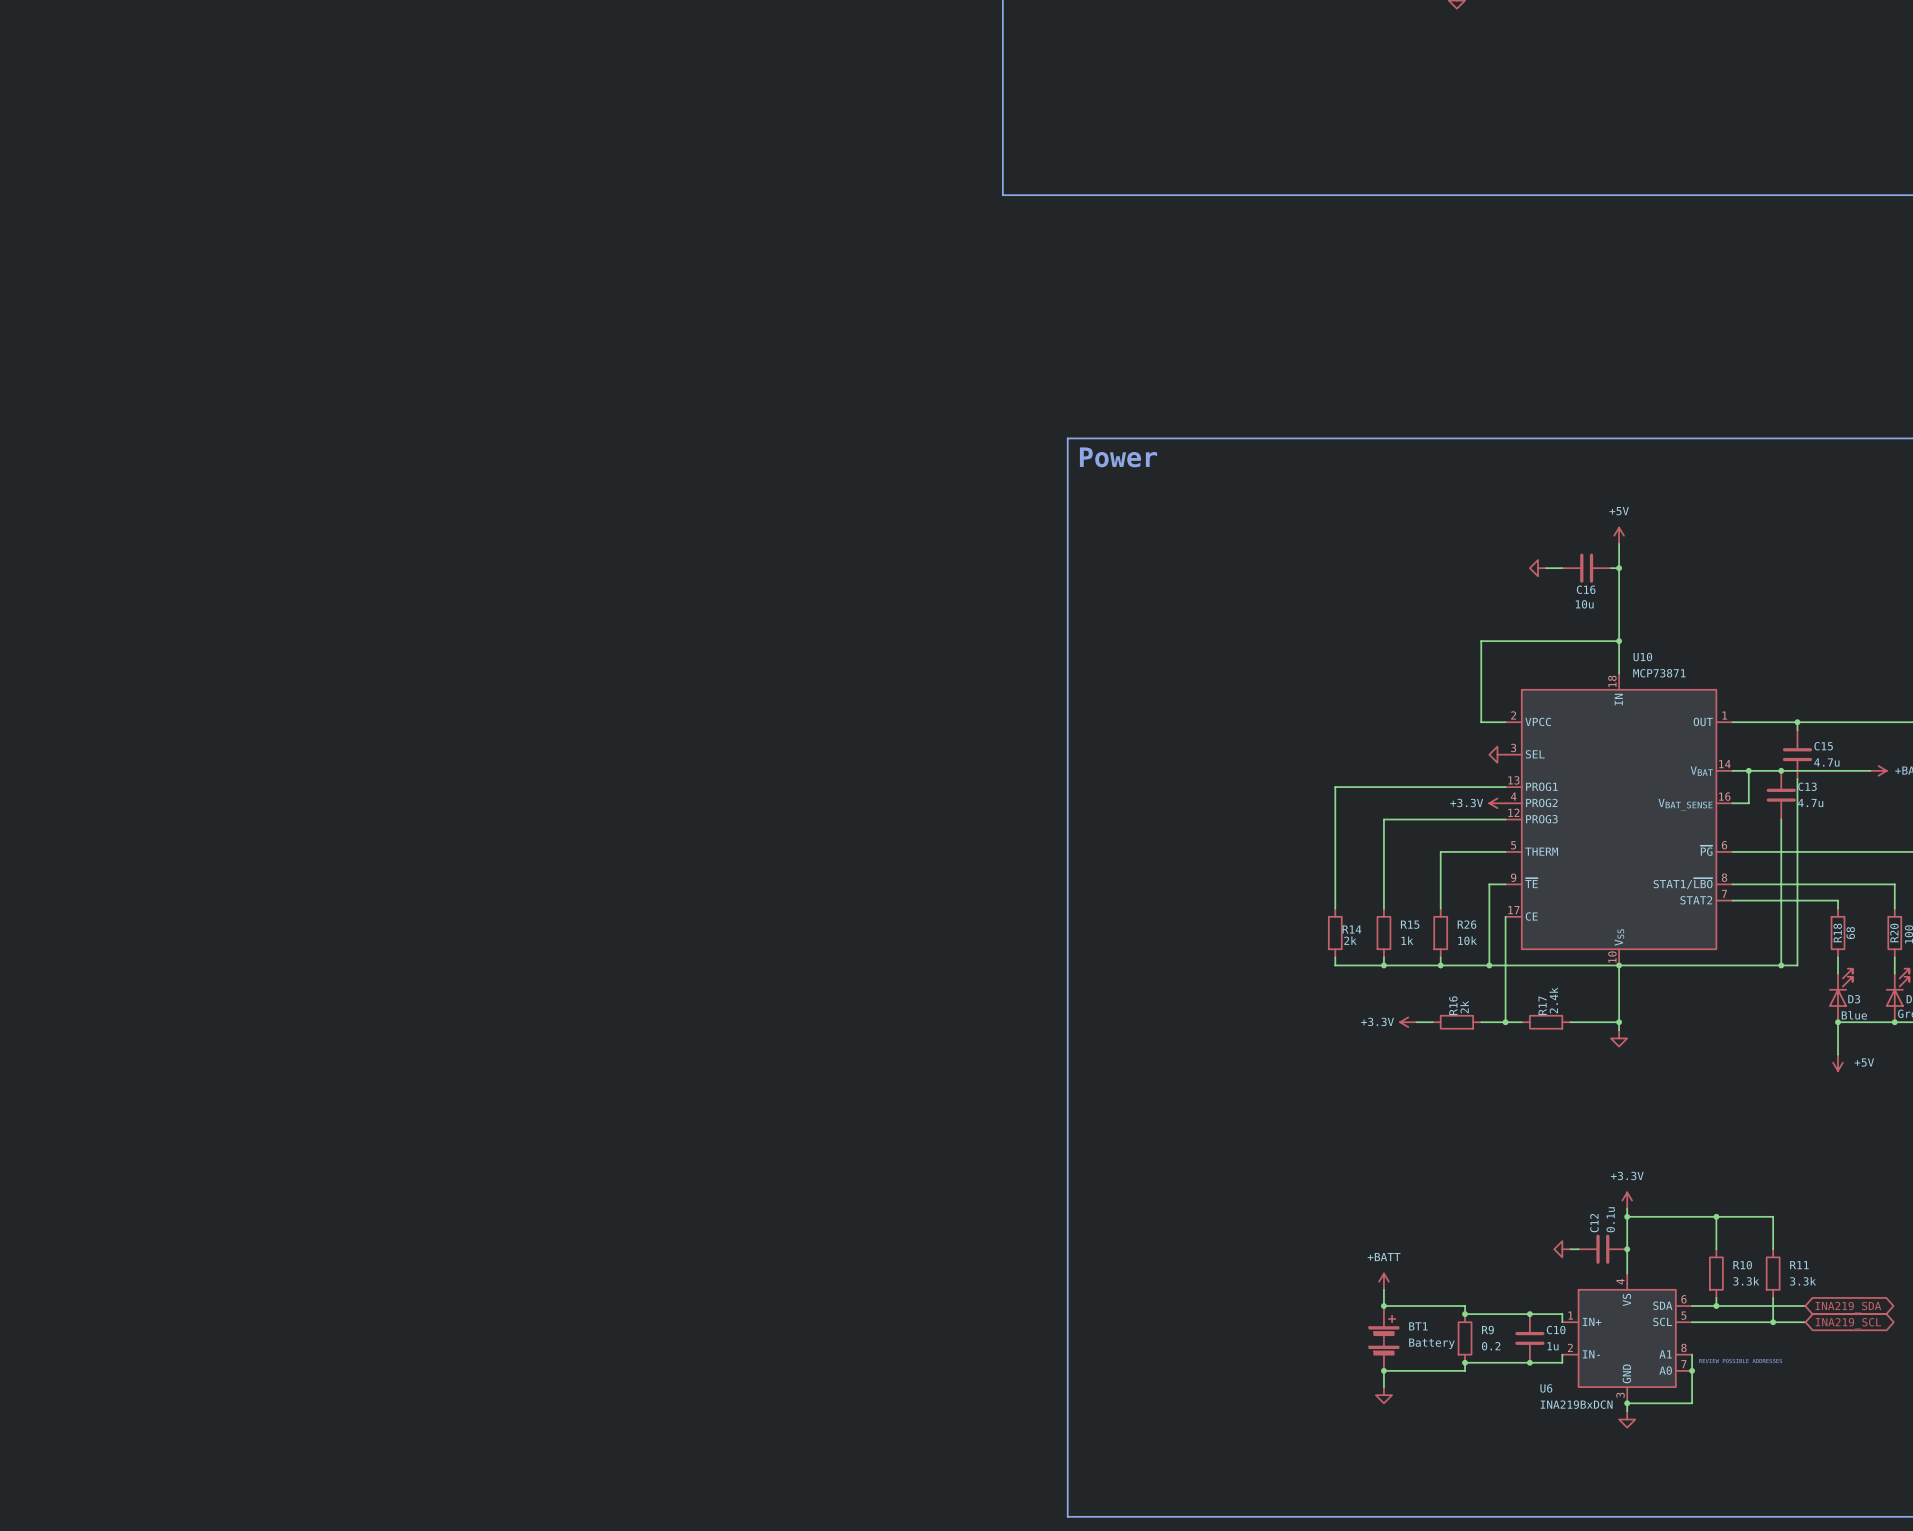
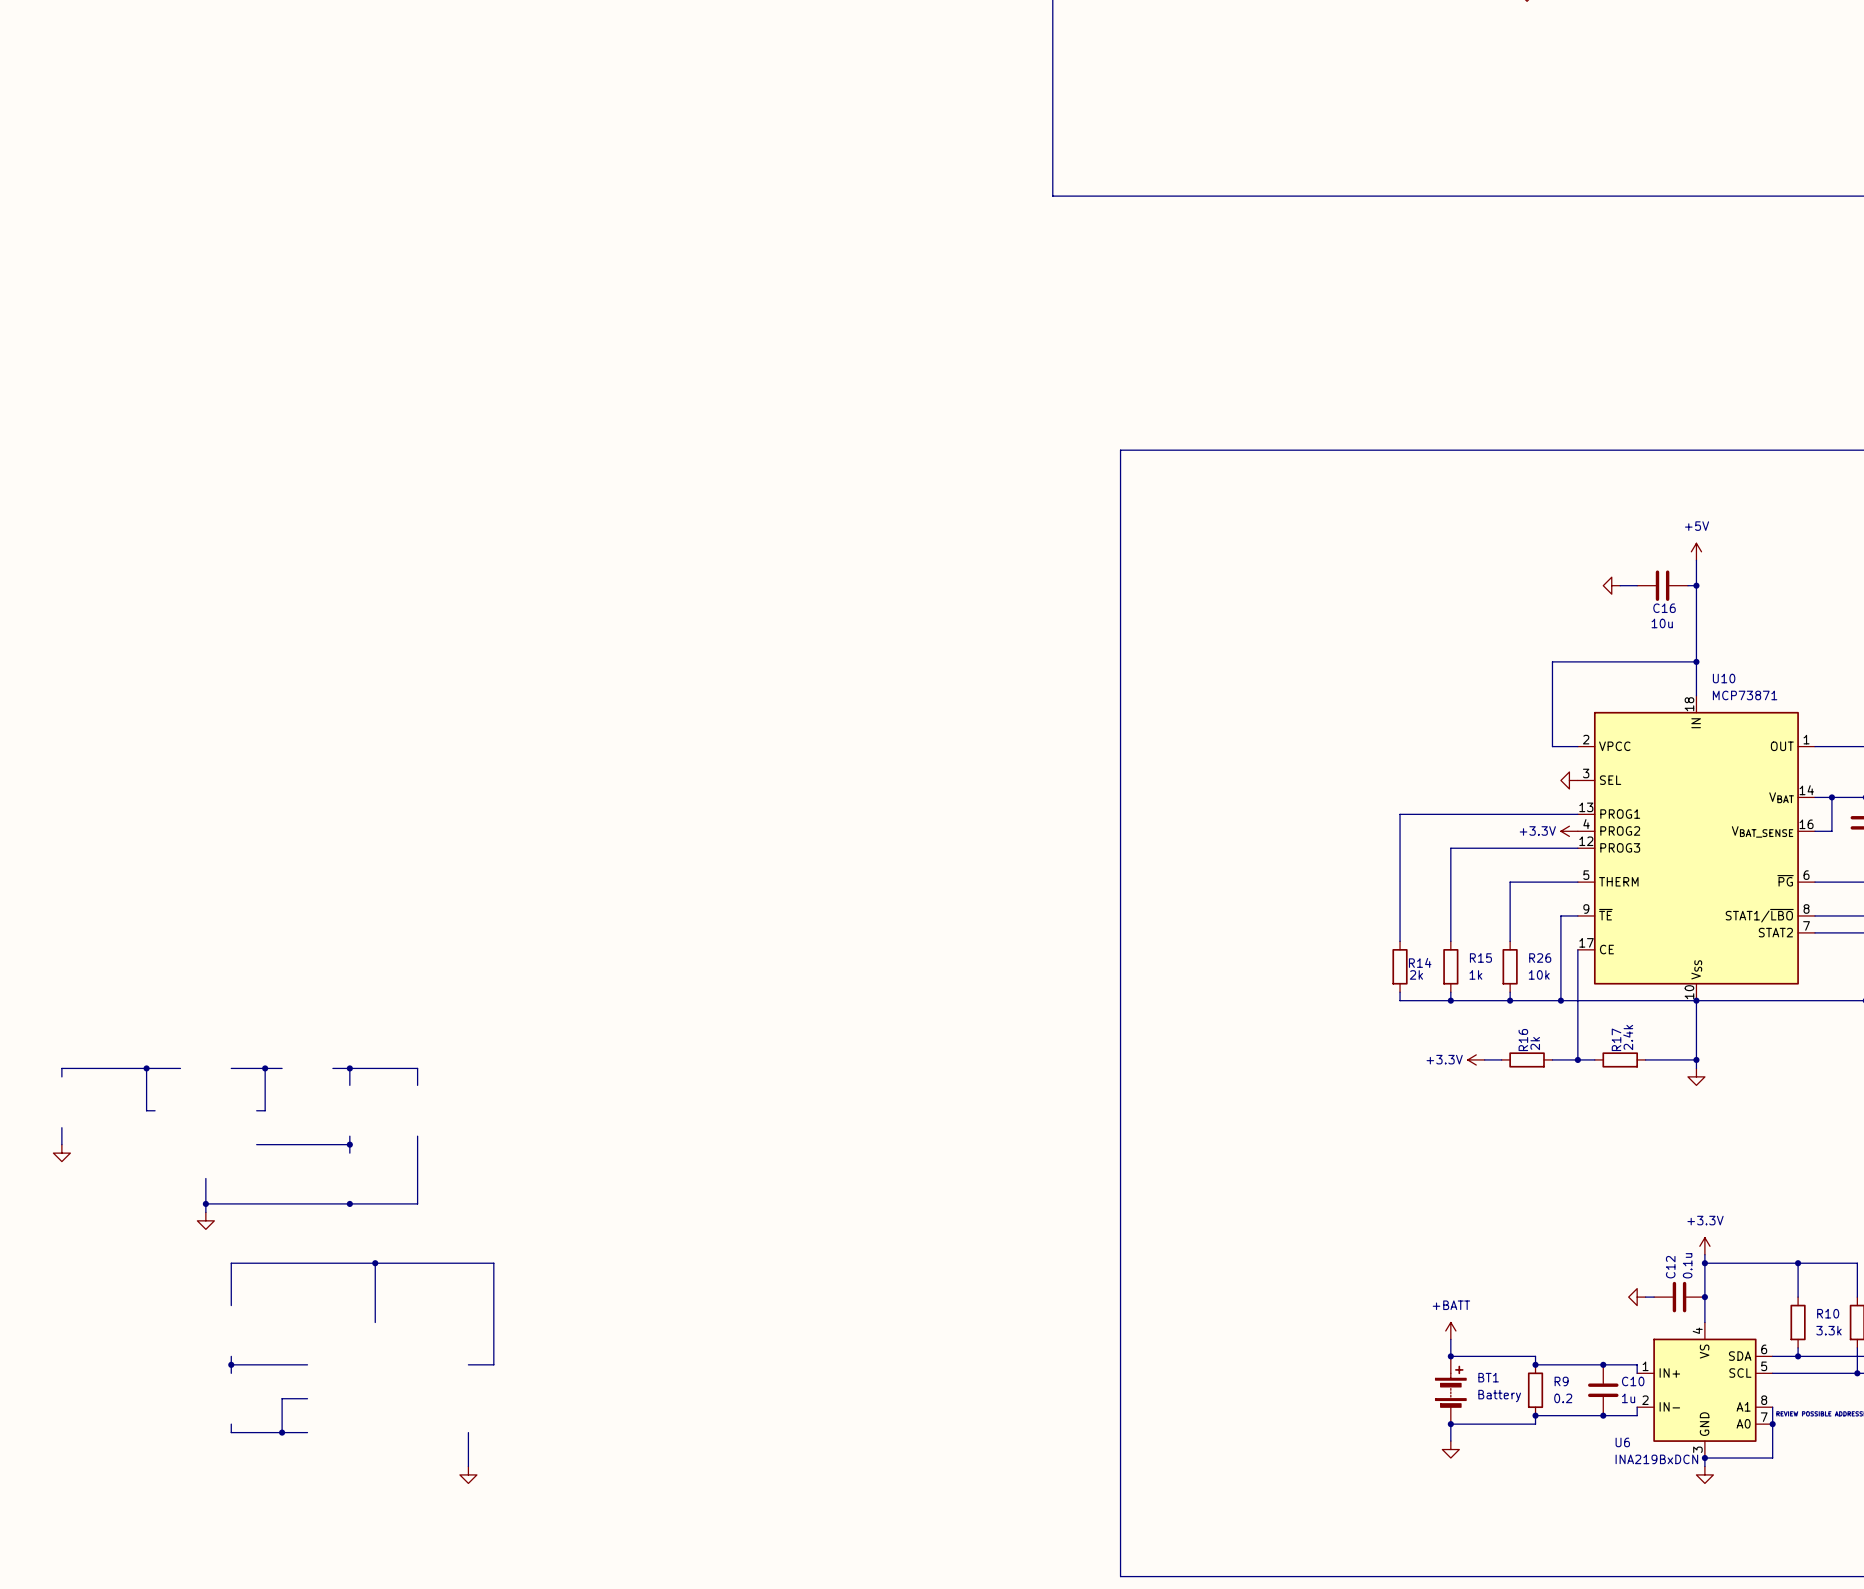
text: Power (1118, 457) -> none
wire: none -> (146, 1068) (146, 1110) (155, 1110)
junction: none -> (146, 1068)
wire: none -> (180, 1068) (61, 1068) (61, 1076)
wire: none -> (231, 1068) (282, 1068)
wire: none -> (265, 1068) (265, 1110) (256, 1110)
junction: none -> (265, 1068)
wire: none -> (332, 1068) (417, 1068) (417, 1085)
wire: none -> (349, 1068) (349, 1085)
junction: none -> (349, 1068)
wire: none -> (61, 1127) (61, 1144)
wire: none -> (349, 1136) (349, 1153)
wire: none -> (417, 1136) (417, 1203) (205, 1203)
wire: none -> (256, 1144) (349, 1144)
junction: none -> (349, 1144)
power symbol: none -> (61, 1153)
wire: none -> (205, 1178) (205, 1212)
junction: none -> (205, 1203)
junction: none -> (349, 1203)
power symbol: none -> (205, 1220)
wire: none -> (375, 1263) (375, 1322)
junction: none -> (375, 1263)
wire: none -> (231, 1305) (231, 1263) (493, 1263) (493, 1364) (468, 1364)
wire: none -> (231, 1356) (231, 1373)
wire: none -> (231, 1364) (307, 1364)
junction: none -> (231, 1364)
wire: none -> (307, 1398) (282, 1398) (282, 1432)
wire: none -> (231, 1424) (231, 1432) (307, 1432)
junction: none -> (282, 1432)
wire: none -> (468, 1432) (468, 1466)
power symbol: none -> (468, 1474)

